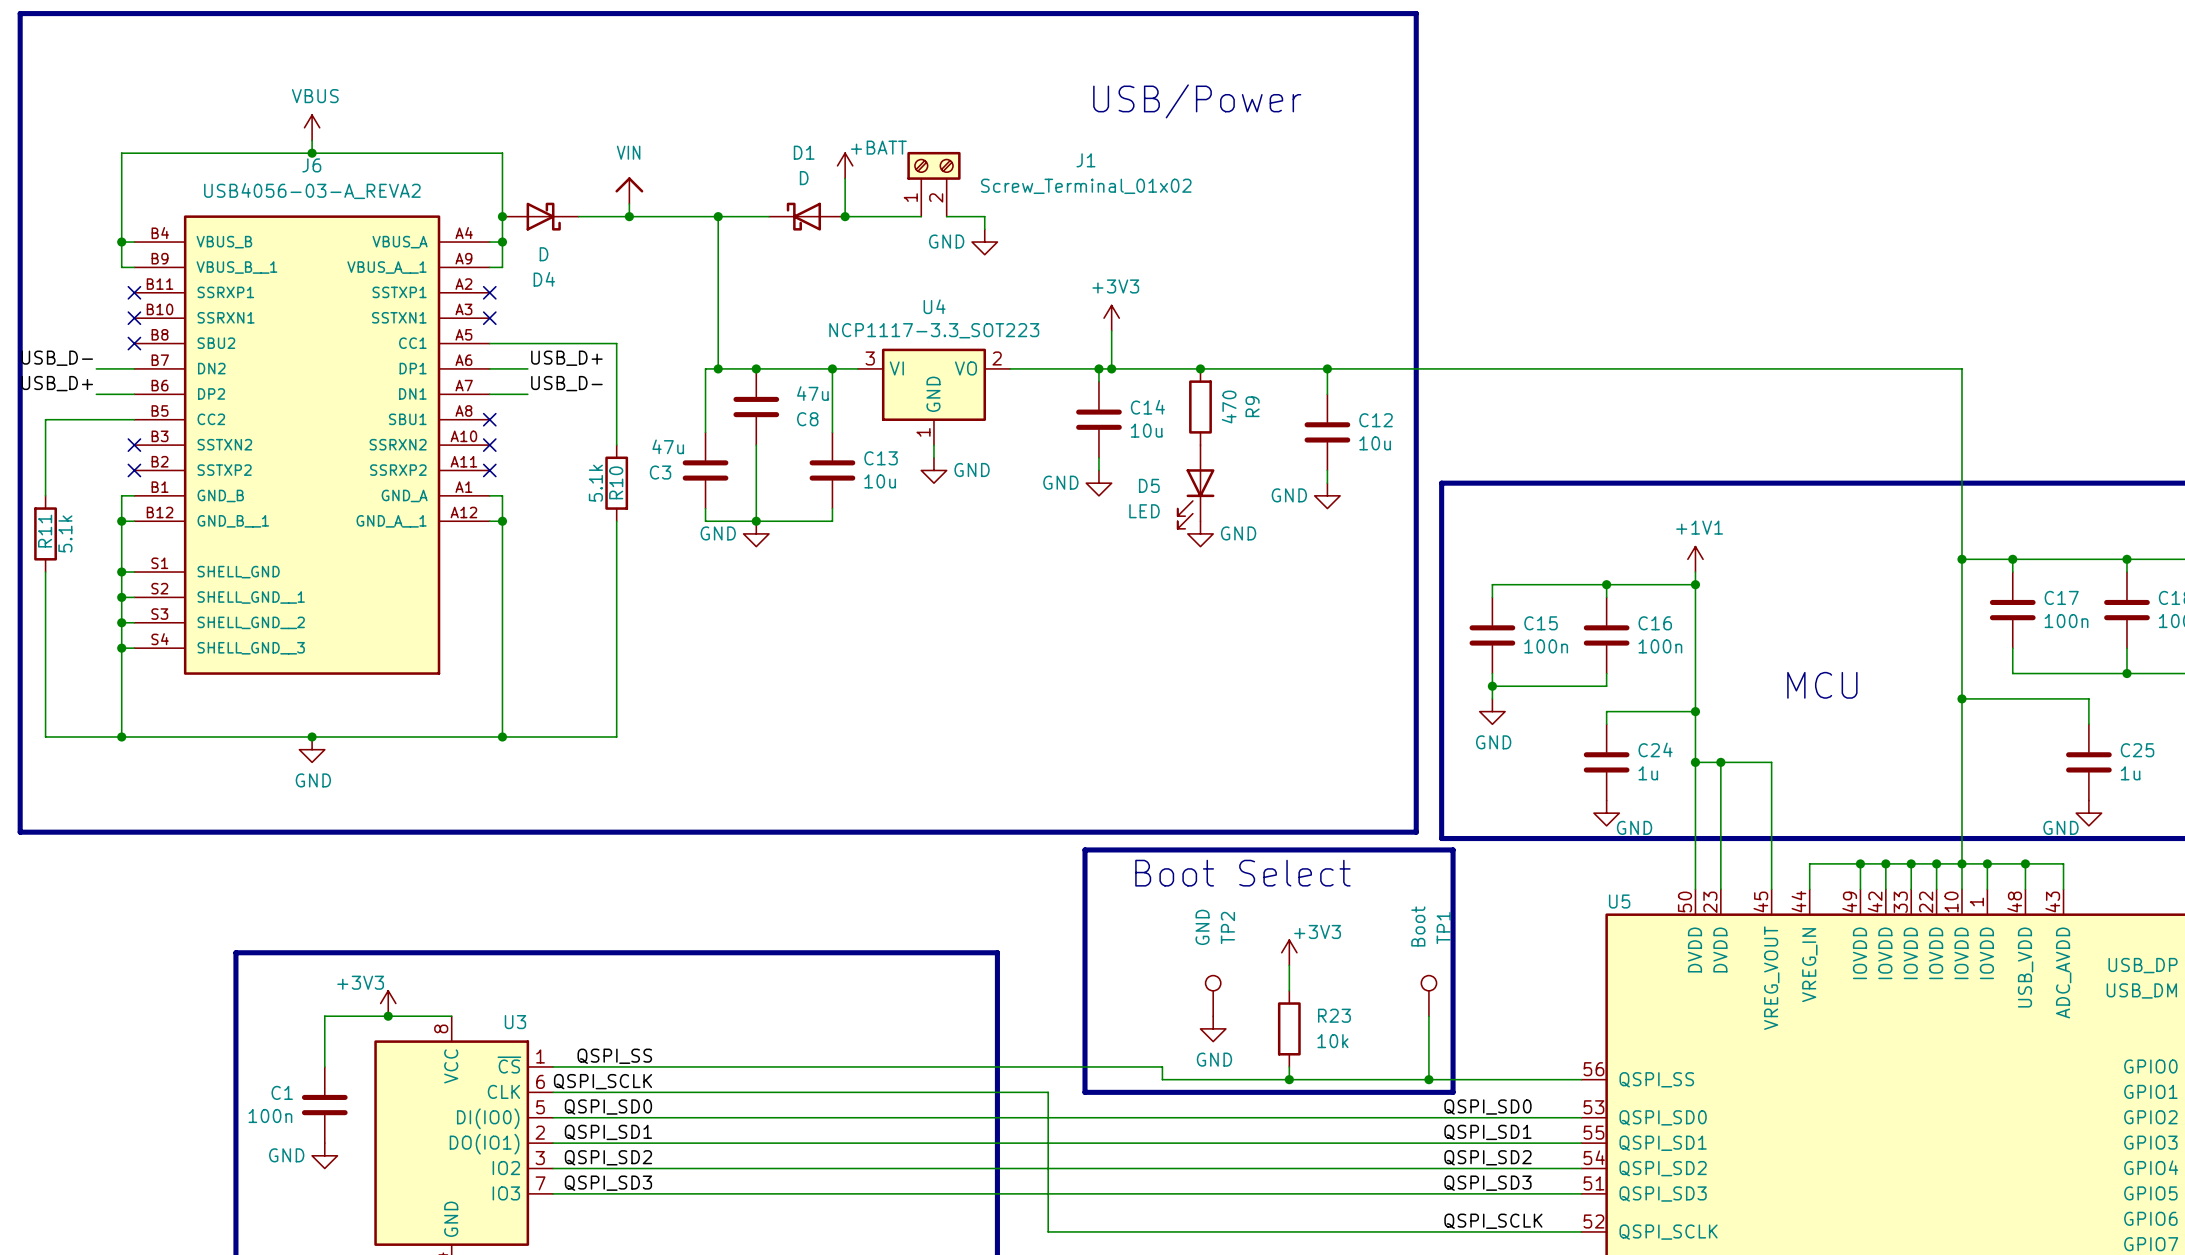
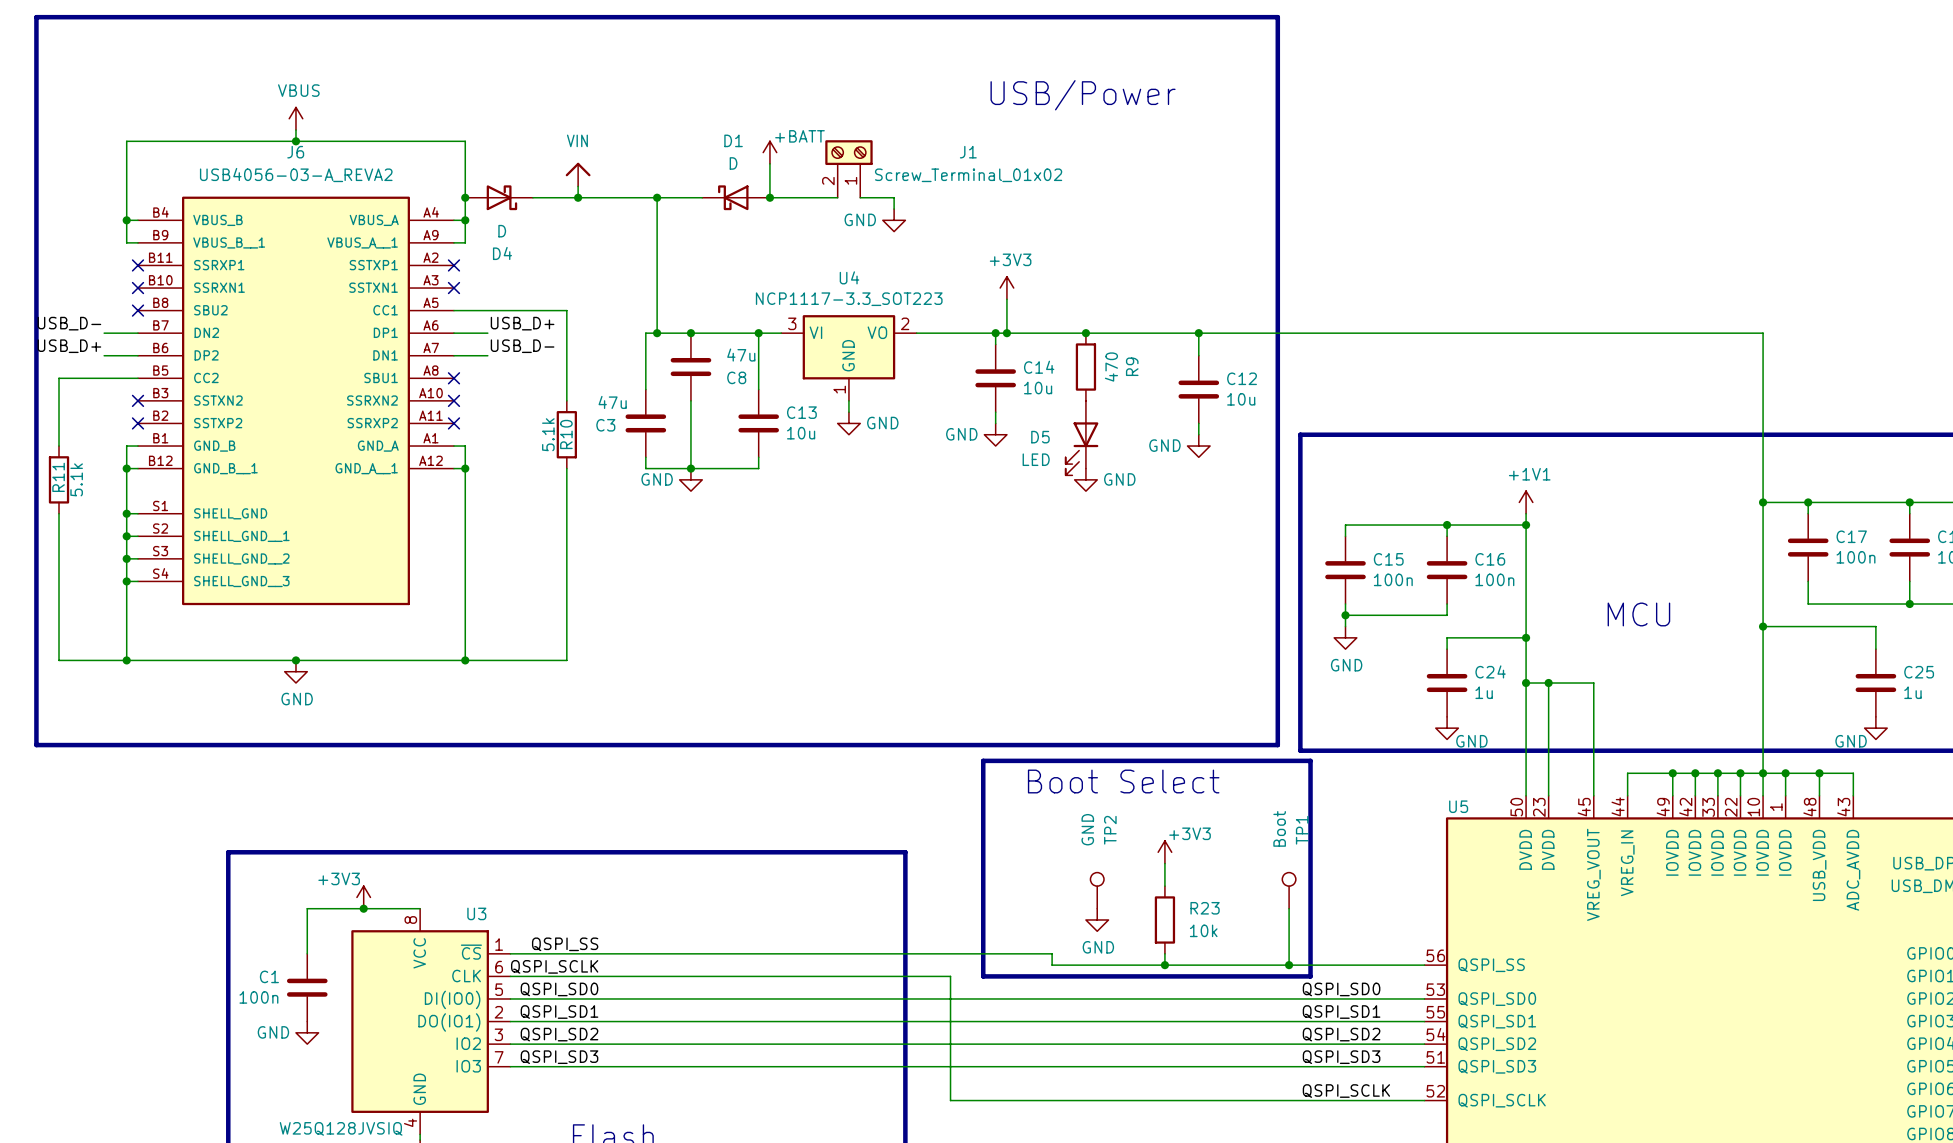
J1 flip: as is (933, 165) -> left-right (848, 152)

